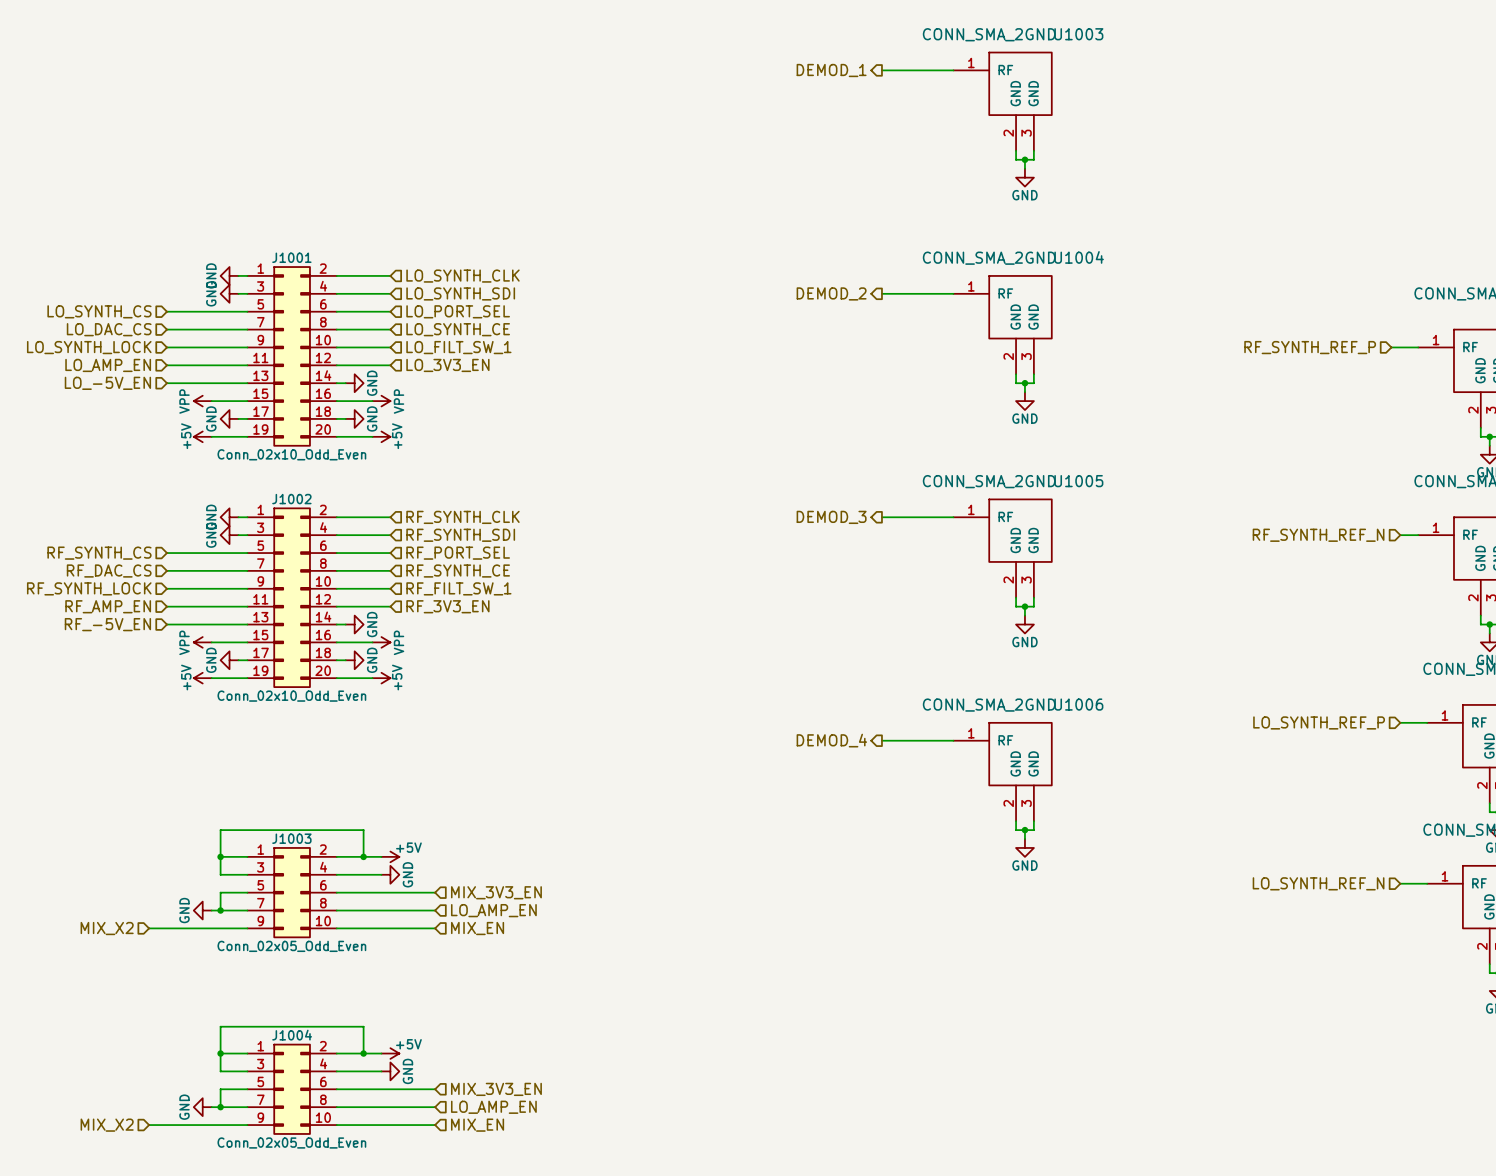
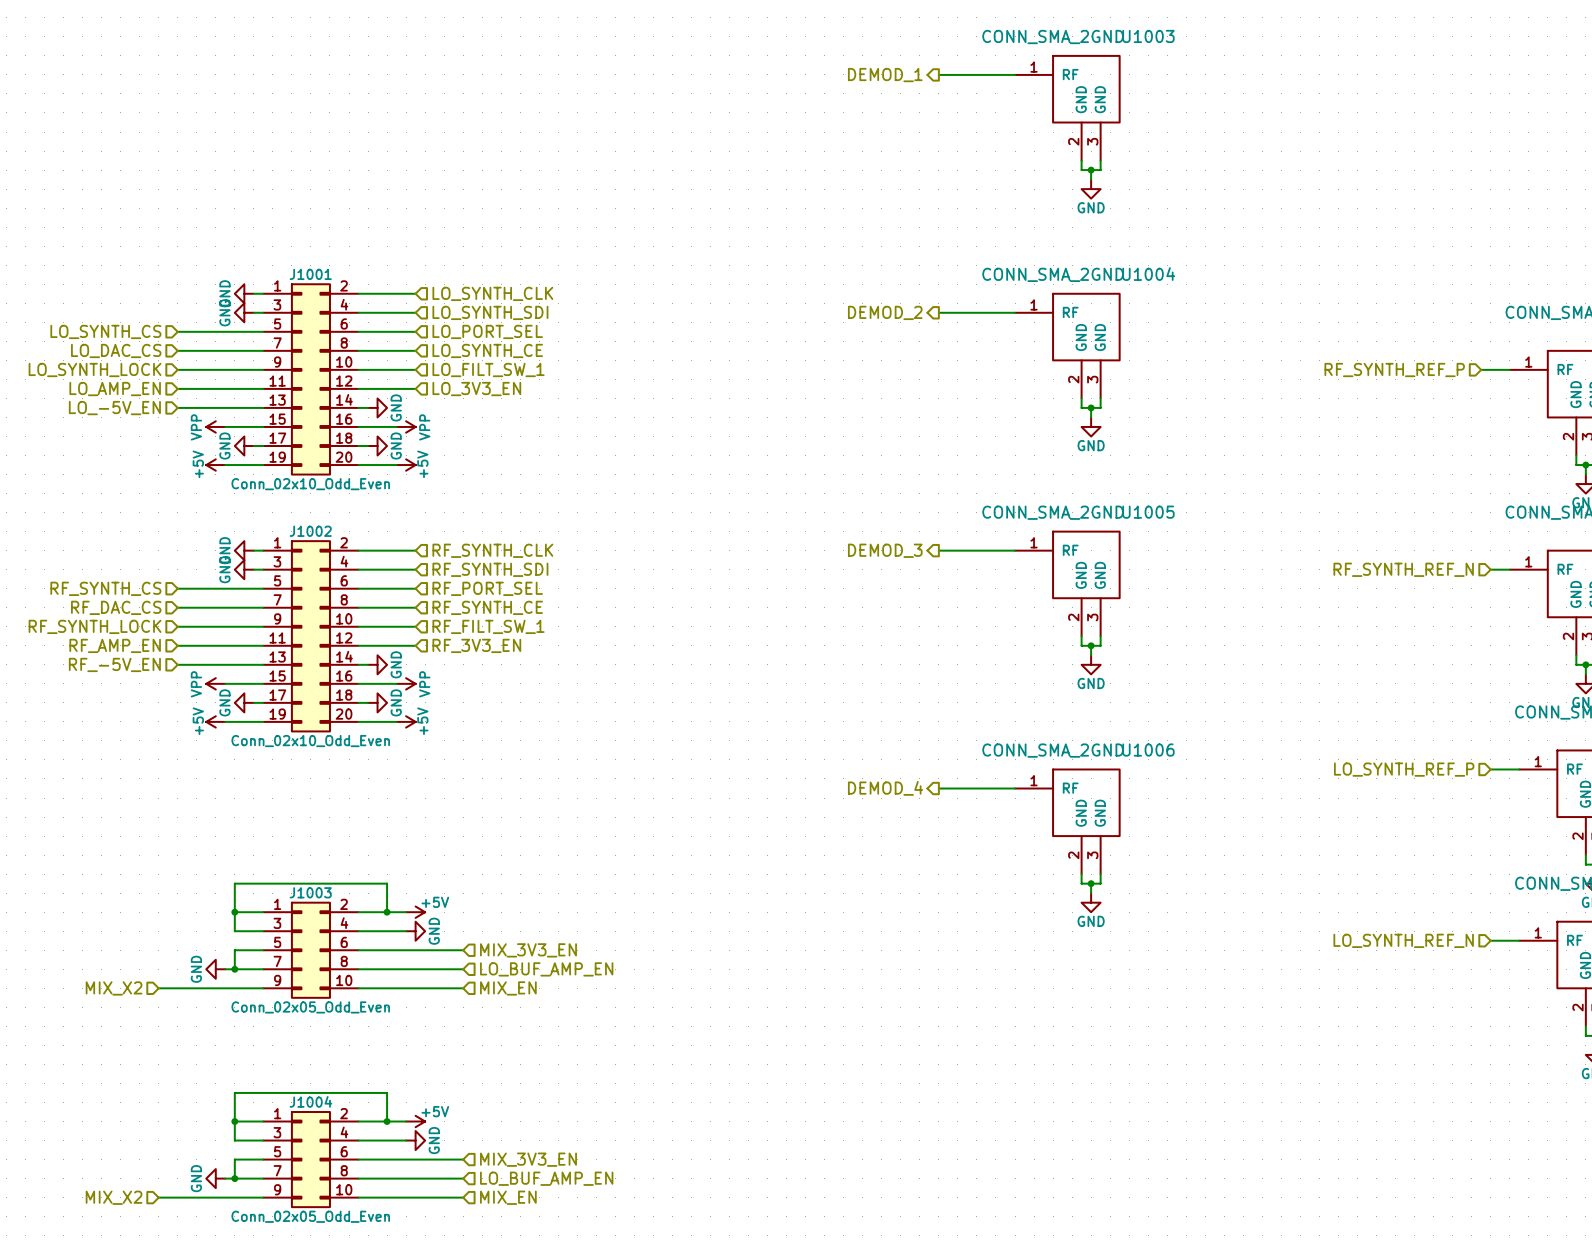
hierarchical label: LO_AMP_EN (493, 910) -> LO_BUF_AMP_EN (546, 969)
hierarchical label: LO_AMP_EN (493, 1107) -> LO_BUF_AMP_EN (546, 1178)

